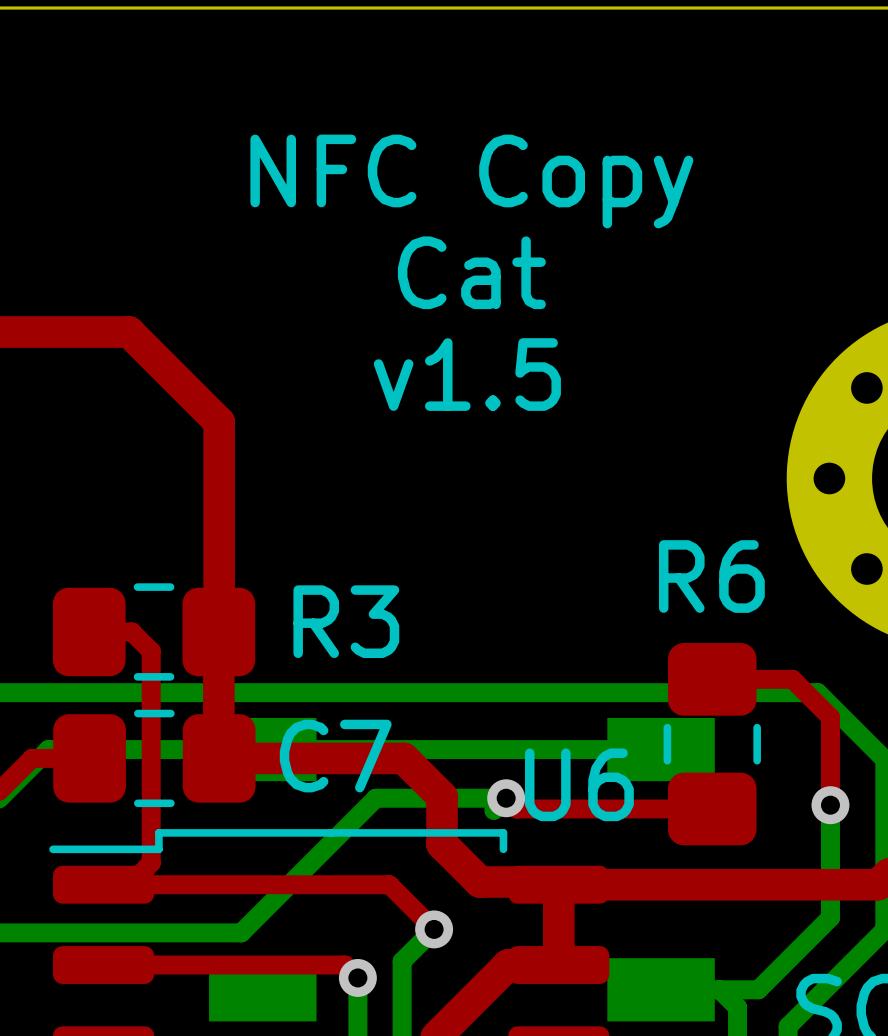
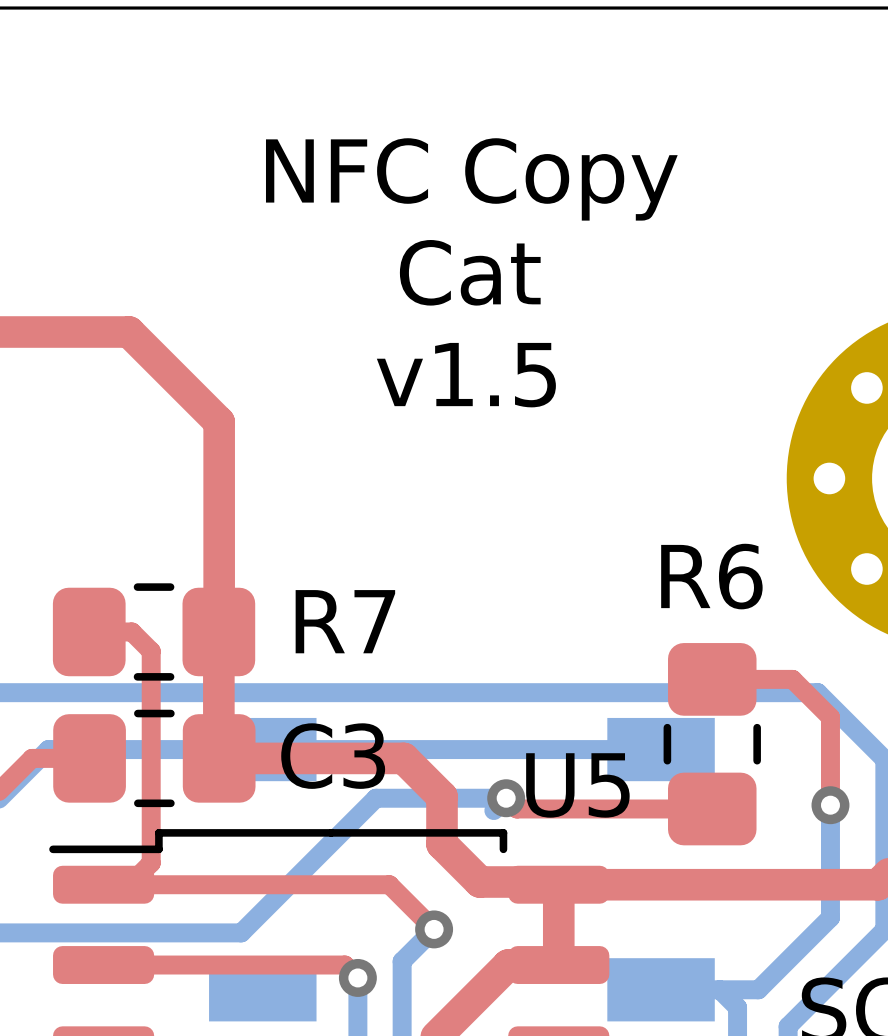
R3 name: R3 (346, 621) -> R7 (345, 621)
C7 name: C7 (335, 756) -> C3 (333, 756)
U6 name: U6 (579, 784) -> U5 (577, 785)

